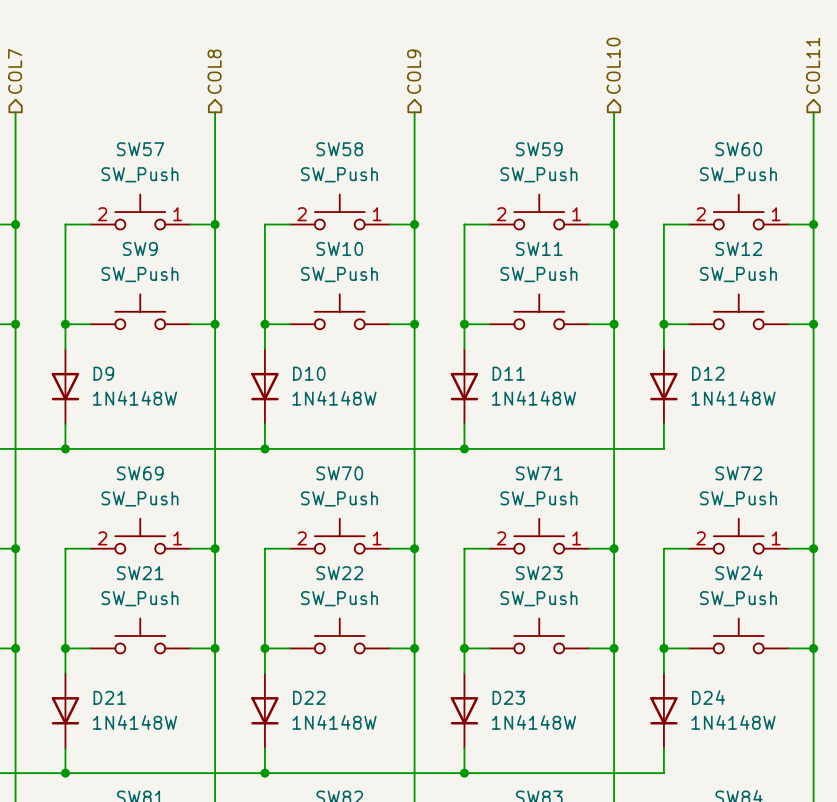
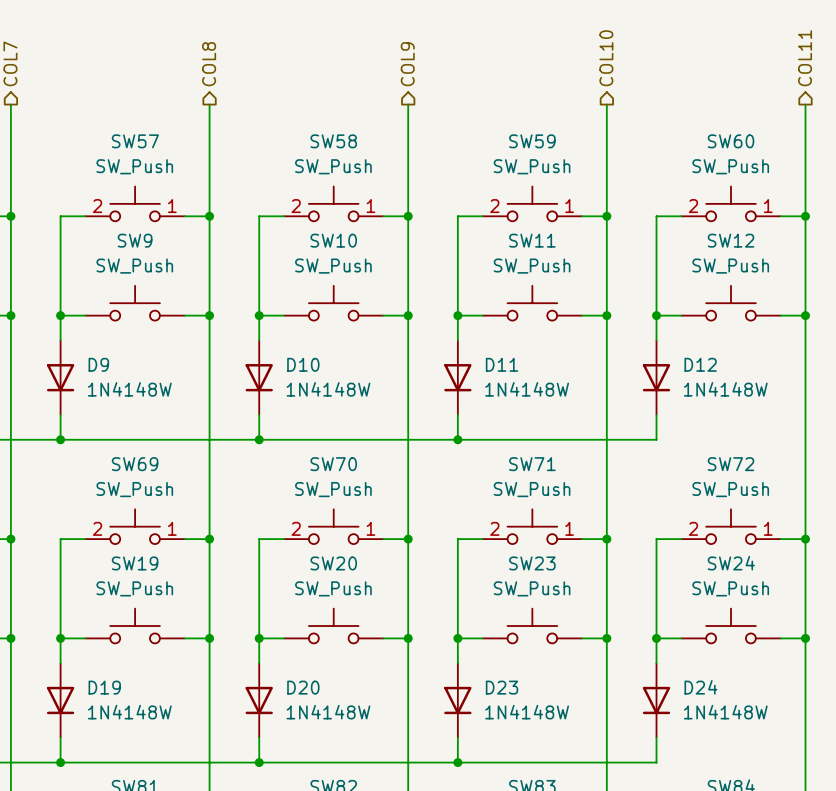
SW21 name: SW21 (140, 573) -> SW19 (135, 563)
SW22 name: SW22 (339, 573) -> SW20 (333, 563)
D21 name: D21 (109, 697) -> D19 (104, 687)
D22 name: D22 (309, 697) -> D20 (303, 687)

